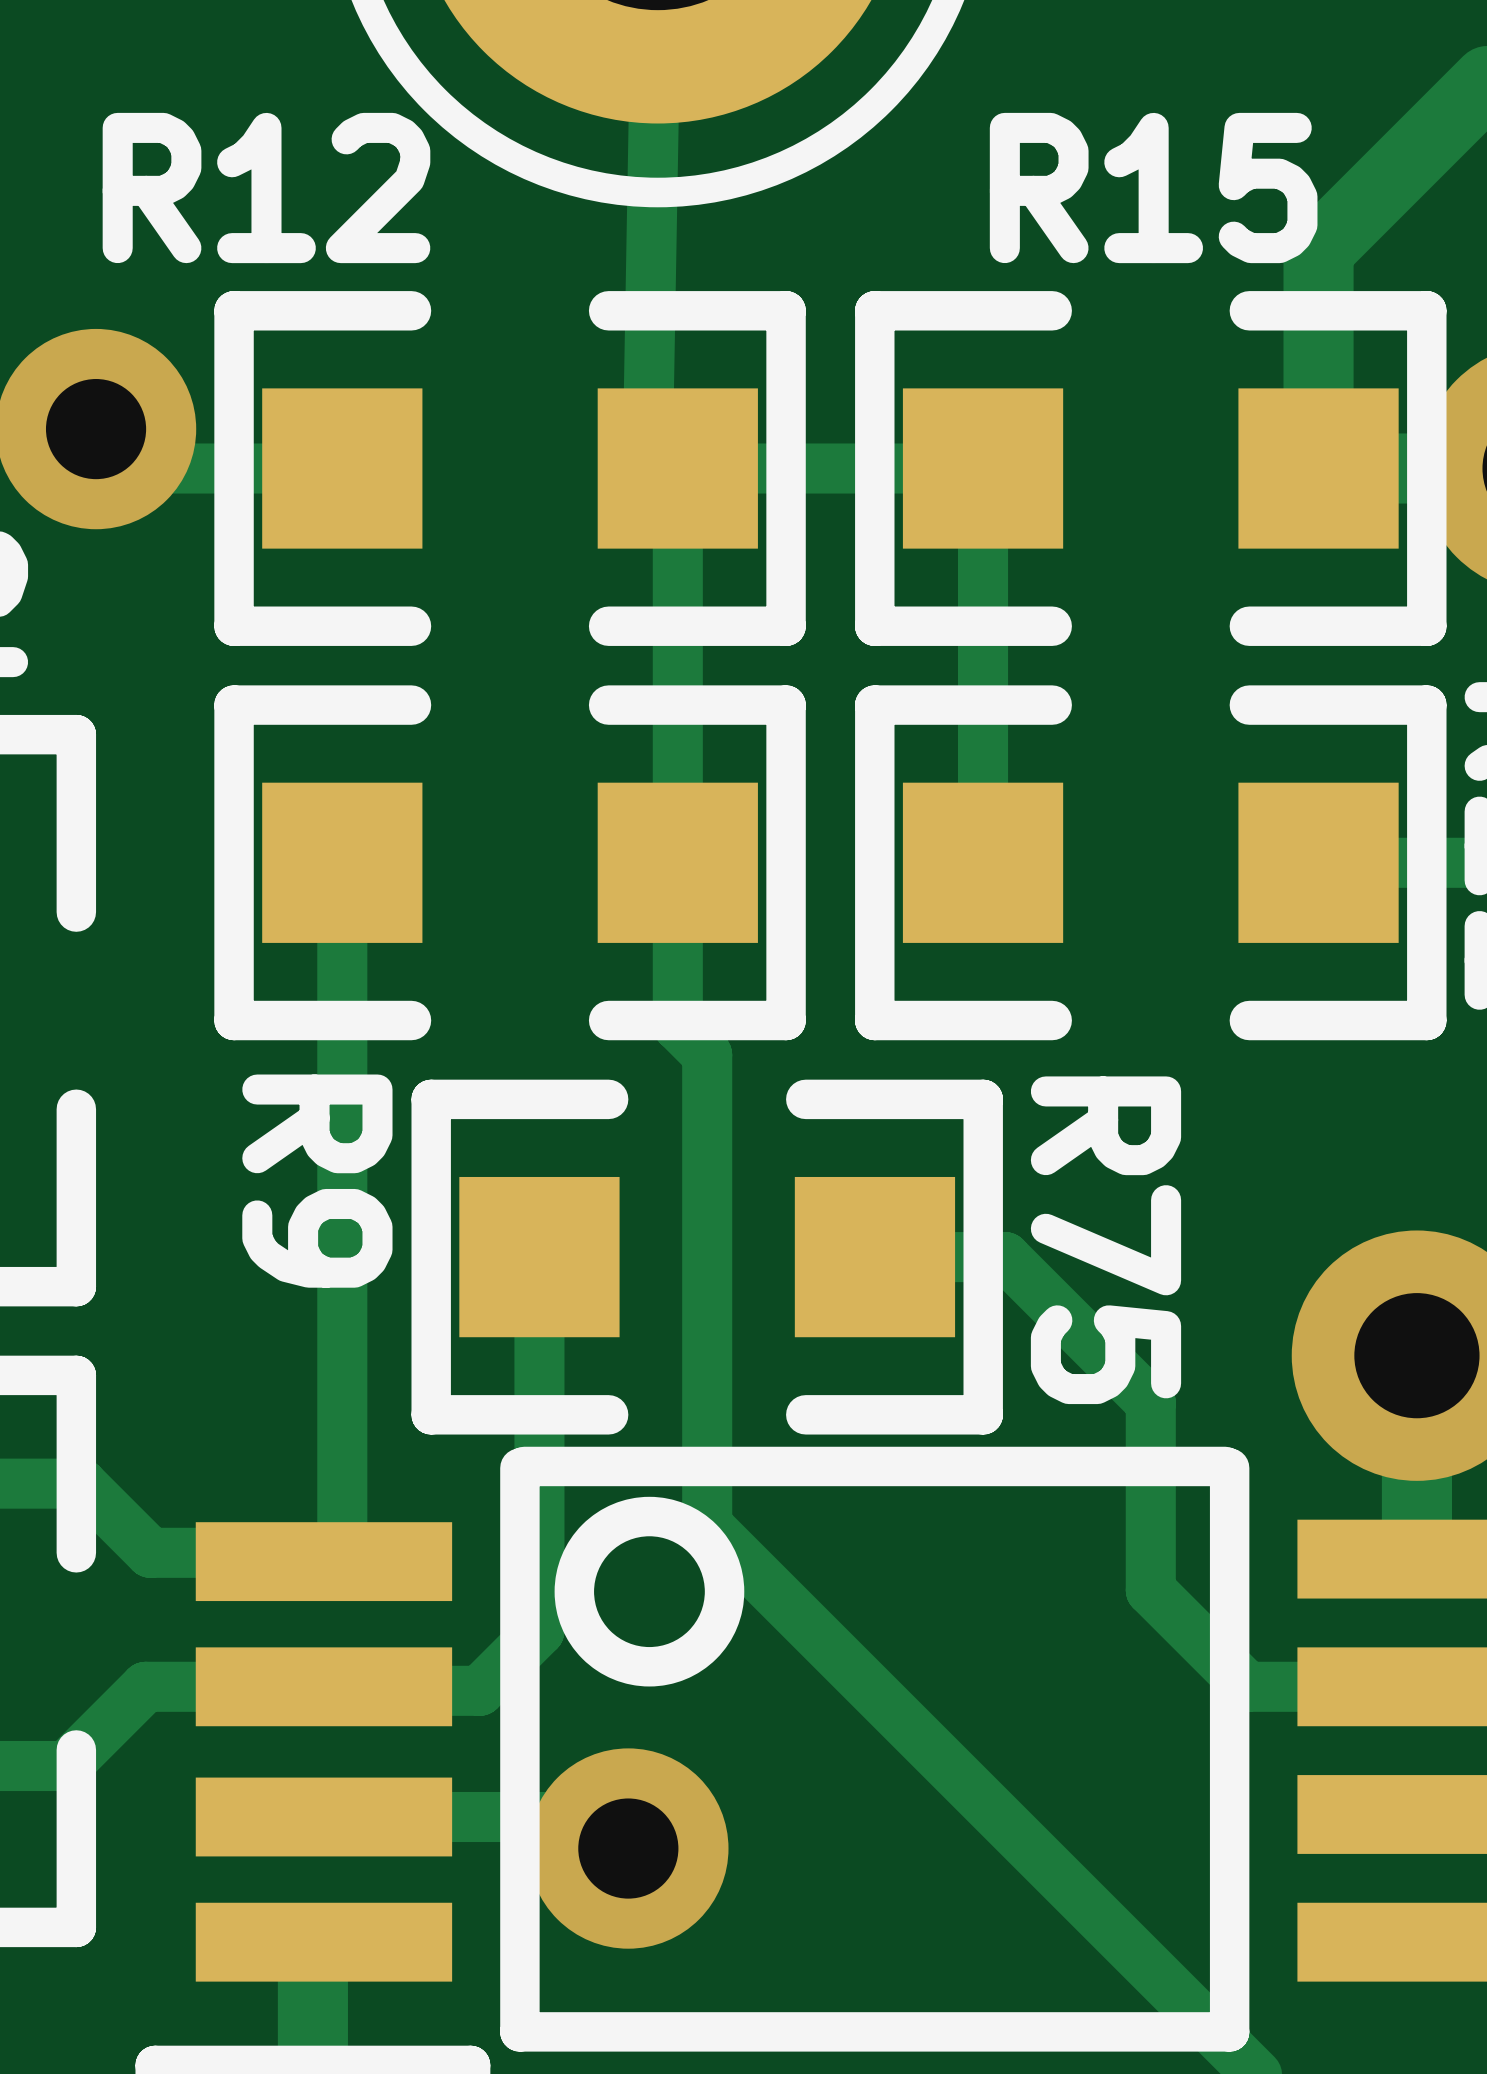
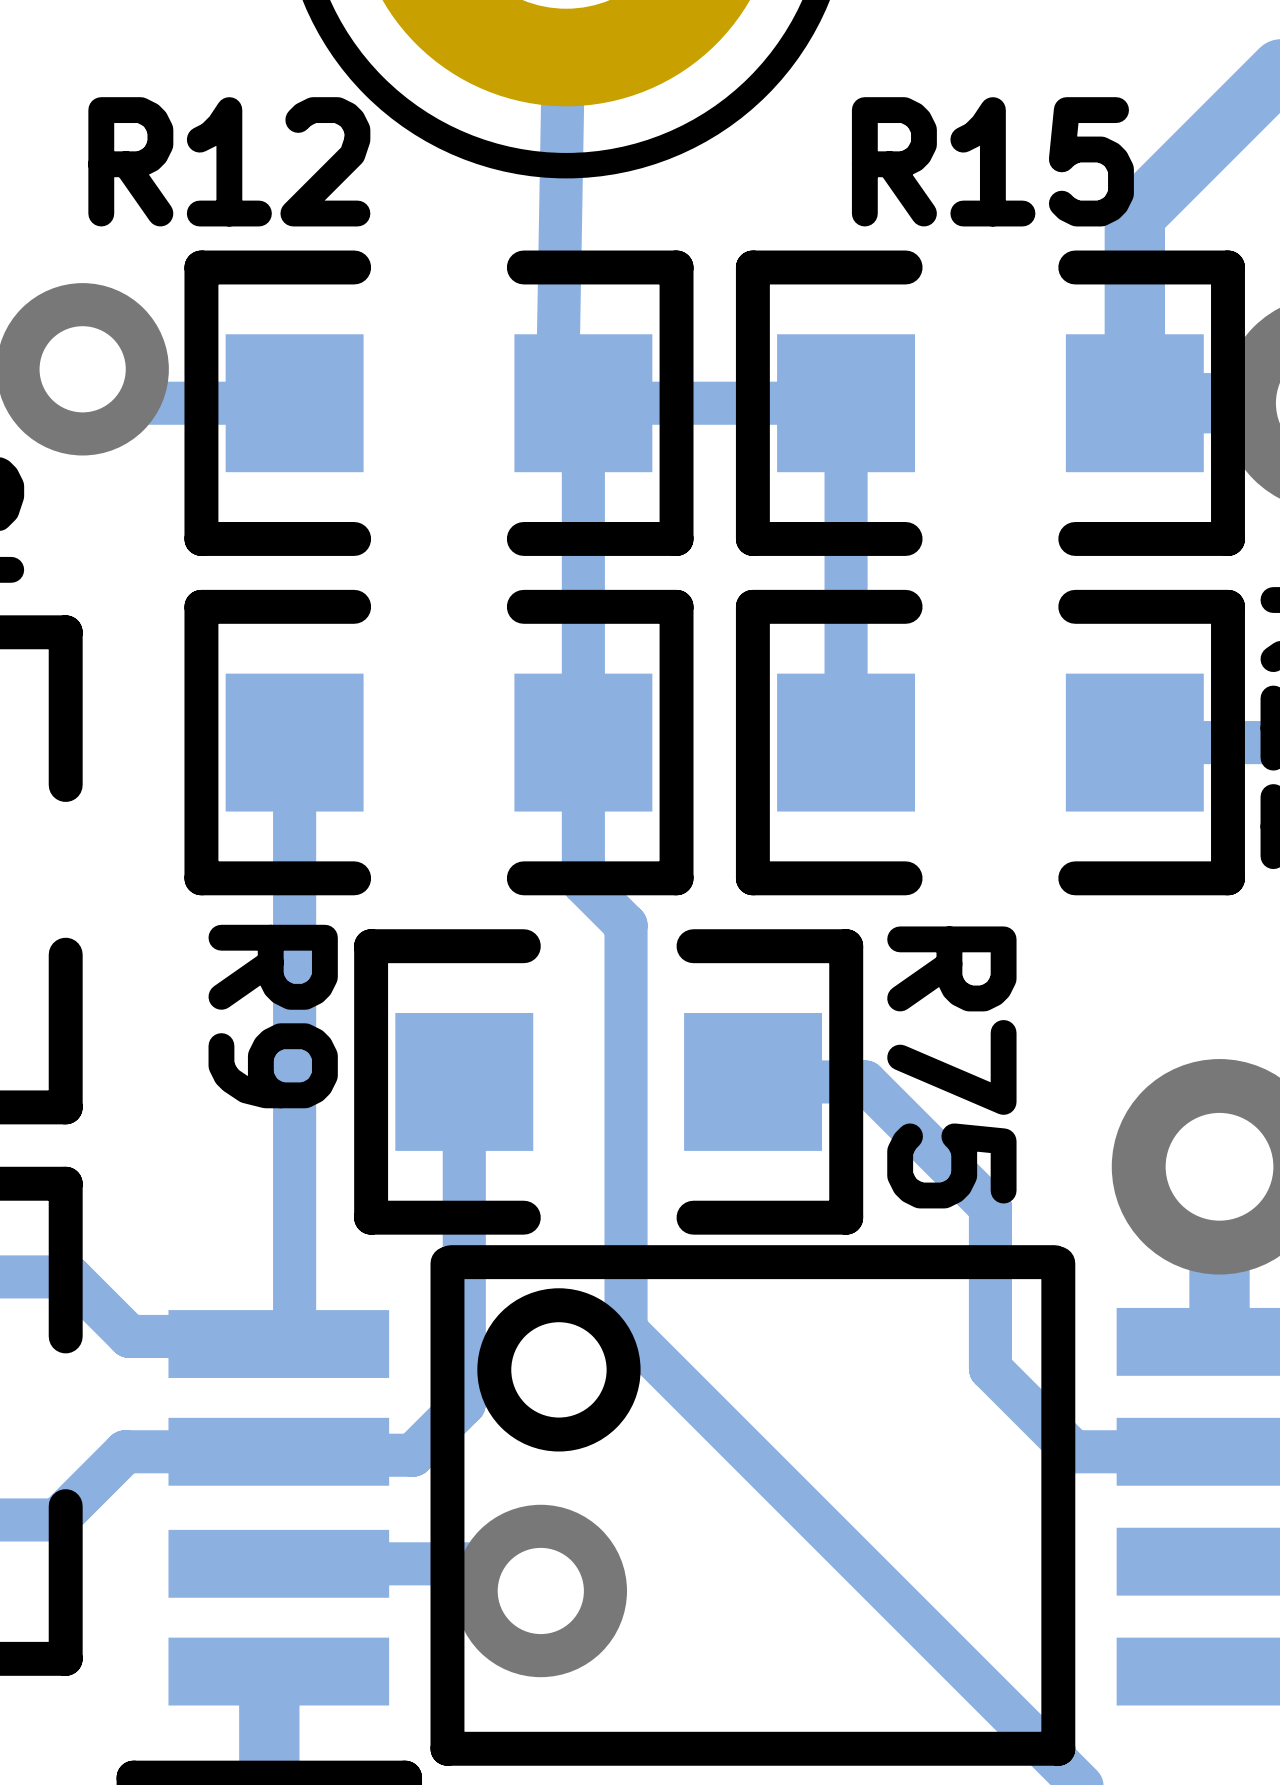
track: (707, 1054) (707, 1525) (727, 1545) -> (608, 907) (626, 925) (626, 1329)

